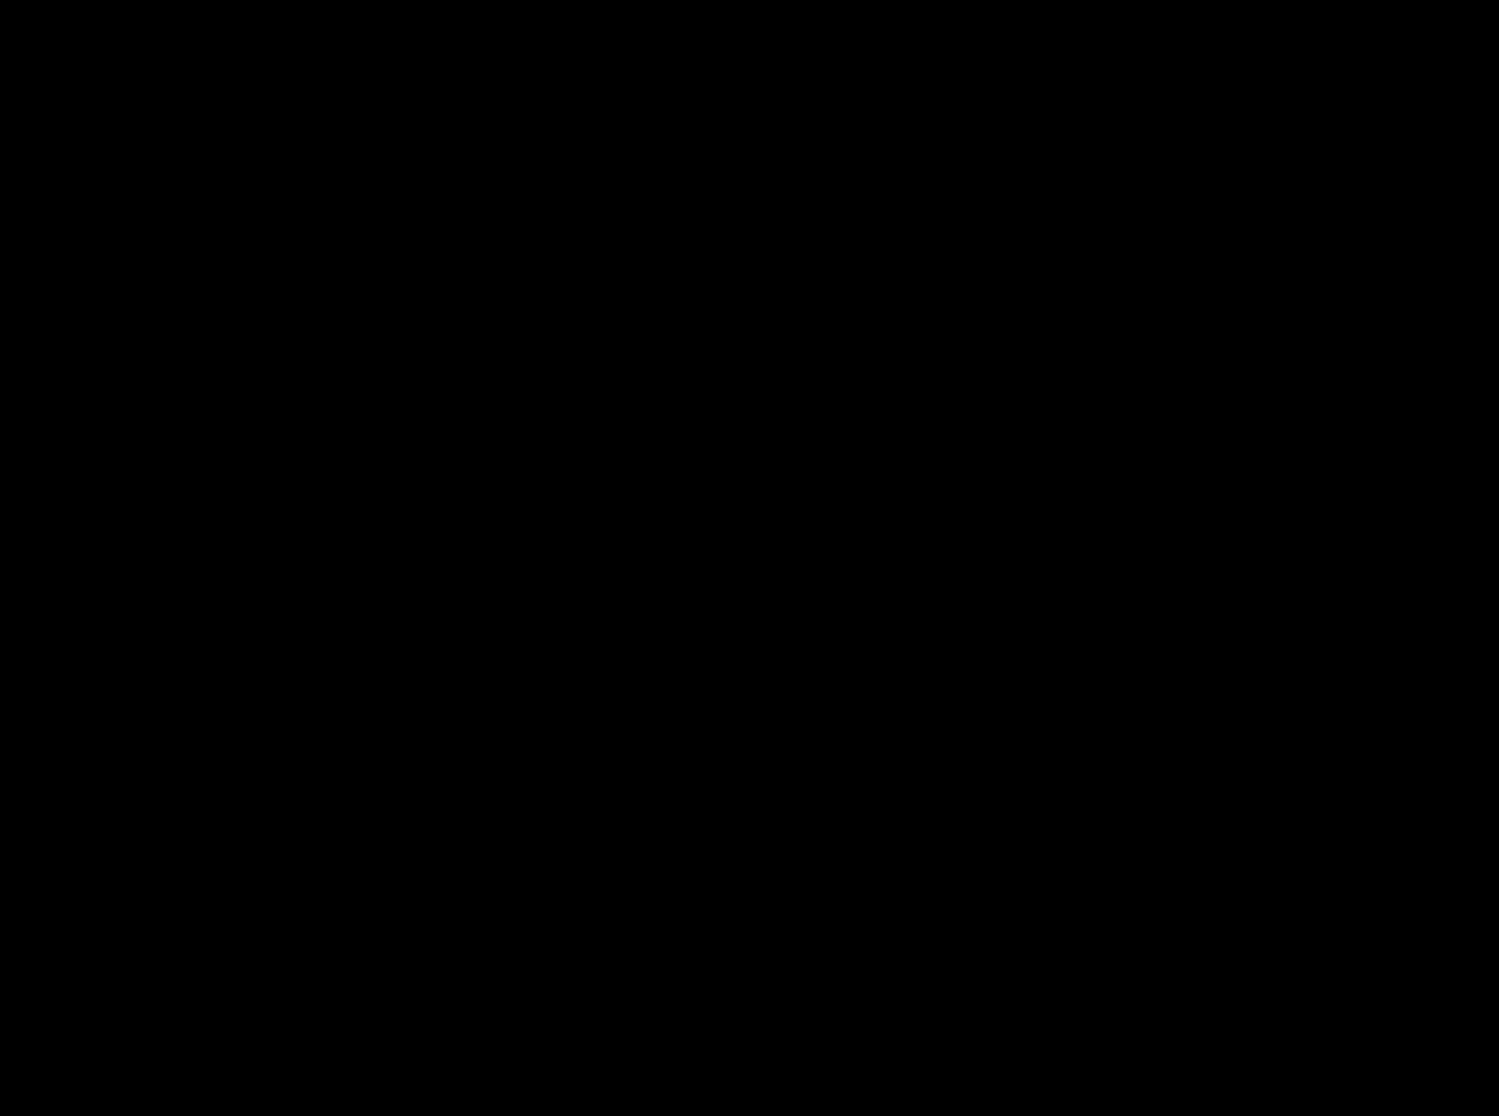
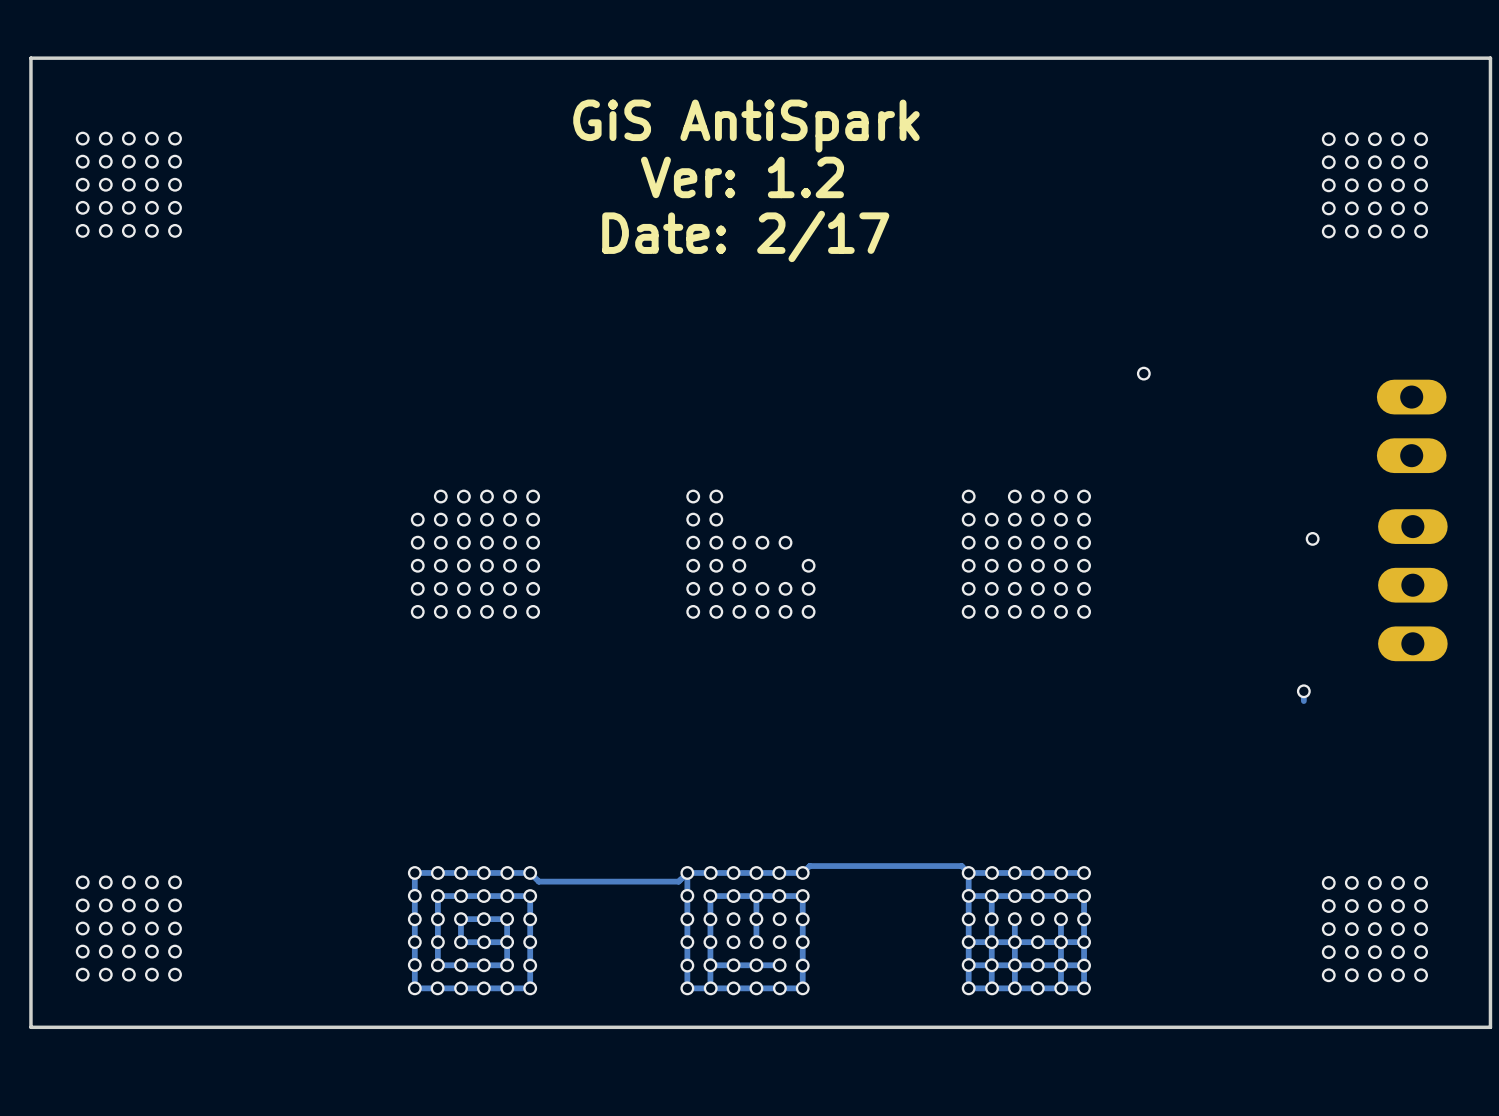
board edge: none -> (1490, 58) (30, 58) (30, 1027) (1490, 1027) (1490, 58)
text: none -> GiS AntiSpark (746, 126)
via: none -> (82, 138)
via: none -> (105, 138)
via: none -> (128, 138)
via: none -> (151, 138)
via: none -> (175, 138)
via: none -> (1328, 139)
via: none -> (1351, 139)
via: none -> (1374, 139)
via: none -> (1397, 139)
via: none -> (1421, 139)
via: none -> (82, 161)
via: none -> (105, 161)
via: none -> (128, 161)
via: none -> (151, 161)
via: none -> (175, 161)
via: none -> (1328, 162)
via: none -> (1351, 162)
via: none -> (1374, 162)
via: none -> (1397, 162)
via: none -> (1421, 162)
text: none -> Ver: 1.2 (742, 177)
via: none -> (82, 184)
via: none -> (105, 184)
via: none -> (128, 184)
via: none -> (151, 184)
via: none -> (175, 184)
via: none -> (1328, 185)
via: none -> (1351, 185)
via: none -> (1374, 185)
via: none -> (1397, 185)
via: none -> (1421, 185)
via: none -> (82, 207)
via: none -> (105, 207)
via: none -> (128, 207)
via: none -> (151, 207)
via: none -> (175, 207)
via: none -> (1328, 208)
via: none -> (1351, 208)
via: none -> (1374, 208)
via: none -> (1397, 208)
via: none -> (1421, 208)
via: none -> (82, 230)
via: none -> (105, 230)
via: none -> (128, 230)
via: none -> (151, 230)
via: none -> (175, 230)
via: none -> (1328, 231)
via: none -> (1351, 231)
via: none -> (1374, 231)
via: none -> (1397, 231)
via: none -> (1421, 231)
text: none -> Date: 2/17 (745, 236)
via: none -> (1143, 373)
part: none -> (1411, 426)
via: none -> (440, 496)
via: none -> (463, 496)
via: none -> (486, 496)
via: none -> (510, 496)
via: none -> (533, 496)
via: none -> (693, 496)
via: none -> (716, 496)
via: none -> (968, 496)
via: none -> (1014, 496)
via: none -> (1037, 496)
via: none -> (1060, 496)
via: none -> (1084, 496)
via: none -> (417, 519)
via: none -> (440, 519)
via: none -> (463, 519)
via: none -> (486, 519)
via: none -> (510, 519)
via: none -> (533, 519)
via: none -> (693, 519)
via: none -> (716, 519)
via: none -> (968, 519)
via: none -> (991, 519)
via: none -> (1014, 519)
via: none -> (1037, 519)
via: none -> (1060, 519)
via: none -> (1084, 519)
via: none -> (1312, 538)
via: none -> (417, 542)
via: none -> (440, 542)
via: none -> (463, 542)
via: none -> (486, 542)
via: none -> (510, 542)
via: none -> (533, 542)
via: none -> (693, 542)
via: none -> (716, 542)
via: none -> (739, 542)
via: none -> (762, 542)
via: none -> (785, 542)
via: none -> (968, 542)
via: none -> (991, 542)
via: none -> (1014, 542)
via: none -> (1037, 542)
via: none -> (1060, 542)
via: none -> (1084, 542)
via: none -> (417, 565)
via: none -> (440, 565)
via: none -> (463, 565)
via: none -> (486, 565)
via: none -> (510, 565)
via: none -> (533, 565)
via: none -> (693, 565)
via: none -> (716, 565)
via: none -> (739, 565)
via: none -> (808, 565)
via: none -> (968, 565)
via: none -> (991, 565)
via: none -> (1014, 565)
via: none -> (1037, 565)
via: none -> (1060, 565)
via: none -> (1084, 565)
part: none -> (1412, 585)
via: none -> (417, 588)
via: none -> (440, 588)
via: none -> (463, 588)
via: none -> (486, 588)
via: none -> (510, 588)
via: none -> (533, 588)
via: none -> (693, 588)
via: none -> (716, 588)
via: none -> (739, 588)
via: none -> (762, 588)
via: none -> (785, 588)
via: none -> (808, 588)
via: none -> (968, 588)
via: none -> (991, 588)
via: none -> (1014, 588)
via: none -> (1037, 588)
via: none -> (1060, 588)
via: none -> (1084, 588)
via: none -> (417, 611)
via: none -> (440, 611)
via: none -> (463, 611)
via: none -> (486, 611)
via: none -> (510, 611)
via: none -> (533, 611)
via: none -> (693, 611)
via: none -> (716, 611)
via: none -> (739, 611)
via: none -> (762, 611)
via: none -> (785, 611)
via: none -> (808, 611)
via: none -> (968, 611)
via: none -> (991, 611)
via: none -> (1014, 611)
via: none -> (1037, 611)
via: none -> (1060, 611)
via: none -> (1084, 611)
track: none -> (1303, 691) (1303, 701)
via: none -> (1303, 691)
via: none -> (414, 872)
via: none -> (437, 872)
via: none -> (461, 872)
via: none -> (483, 872)
via: none -> (507, 872)
via: none -> (530, 872)
track: none -> (687, 872) (687, 988) (802, 988) (802, 896) (710, 896) (710, 988)
track: none -> (687, 872) (678, 881) (538, 881) (530, 872) (414, 872) (414, 988) (530, 988) (530, 896) (437, 896) (437, 965) (507, 965) (507, 919) (460, 919) (460, 942) (507, 942)
via: none -> (687, 872)
via: none -> (710, 872)
via: none -> (733, 872)
via: none -> (756, 872)
via: none -> (779, 872)
via: none -> (802, 872)
track: none -> (968, 872) (968, 988) (1084, 988) (1084, 896) (968, 896)
track: none -> (968, 872) (961, 866) (809, 866) (802, 872) (687, 872)
via: none -> (968, 872)
via: none -> (992, 872)
via: none -> (1014, 872)
via: none -> (1037, 872)
via: none -> (1061, 872)
track: none -> (1084, 872) (968, 872)
via: none -> (1084, 872)
via: none -> (82, 882)
via: none -> (105, 882)
via: none -> (128, 882)
via: none -> (151, 882)
via: none -> (175, 882)
via: none -> (1328, 882)
via: none -> (1351, 882)
via: none -> (1374, 882)
via: none -> (1397, 882)
via: none -> (1421, 882)
via: none -> (414, 895)
via: none -> (687, 895)
via: none -> (968, 895)
via: none -> (437, 896)
via: none -> (461, 896)
via: none -> (483, 896)
via: none -> (507, 896)
via: none -> (530, 896)
via: none -> (710, 896)
via: none -> (733, 896)
track: none -> (756, 896) (756, 942)
via: none -> (756, 896)
via: none -> (779, 896)
via: none -> (802, 896)
track: none -> (991, 896) (991, 988)
via: none -> (991, 896)
via: none -> (1014, 896)
via: none -> (1037, 896)
via: none -> (1061, 896)
via: none -> (1084, 896)
via: none -> (82, 905)
via: none -> (105, 905)
via: none -> (128, 905)
via: none -> (151, 905)
via: none -> (175, 905)
via: none -> (1328, 906)
via: none -> (1351, 906)
via: none -> (1374, 906)
via: none -> (1397, 906)
via: none -> (1421, 906)
via: none -> (414, 919)
via: none -> (437, 919)
via: none -> (460, 919)
via: none -> (483, 919)
via: none -> (507, 919)
via: none -> (530, 919)
via: none -> (687, 919)
via: none -> (710, 919)
via: none -> (733, 919)
via: none -> (756, 919)
via: none -> (779, 919)
via: none -> (802, 919)
via: none -> (968, 919)
via: none -> (991, 919)
track: none -> (1014, 919) (1014, 988)
via: none -> (1014, 919)
via: none -> (1037, 919)
track: none -> (1060, 919) (1060, 988)
via: none -> (1060, 919)
via: none -> (1084, 919)
via: none -> (82, 928)
via: none -> (105, 928)
via: none -> (128, 928)
via: none -> (151, 928)
via: none -> (175, 928)
via: none -> (1328, 929)
via: none -> (1351, 929)
via: none -> (1374, 929)
via: none -> (1397, 929)
via: none -> (1421, 929)
via: none -> (414, 942)
via: none -> (437, 942)
via: none -> (460, 942)
via: none -> (484, 942)
via: none -> (507, 942)
via: none -> (530, 942)
via: none -> (687, 942)
via: none -> (710, 942)
via: none -> (733, 942)
via: none -> (756, 942)
via: none -> (779, 942)
via: none -> (802, 942)
via: none -> (968, 942)
via: none -> (991, 942)
via: none -> (1014, 942)
via: none -> (1037, 942)
via: none -> (1060, 942)
track: none -> (1084, 942) (968, 942)
via: none -> (1084, 942)
via: none -> (82, 951)
via: none -> (105, 951)
via: none -> (128, 951)
via: none -> (151, 951)
via: none -> (175, 951)
via: none -> (1328, 952)
via: none -> (1351, 952)
via: none -> (1374, 952)
via: none -> (1397, 952)
via: none -> (1421, 952)
via: none -> (414, 965)
via: none -> (437, 965)
via: none -> (461, 965)
via: none -> (483, 965)
via: none -> (507, 965)
via: none -> (530, 965)
via: none -> (687, 965)
via: none -> (710, 965)
via: none -> (733, 965)
via: none -> (756, 965)
track: none -> (779, 965) (710, 965)
via: none -> (779, 965)
via: none -> (802, 965)
via: none -> (968, 965)
via: none -> (991, 965)
via: none -> (1014, 965)
via: none -> (1037, 965)
via: none -> (1060, 965)
track: none -> (1083, 965) (968, 965)
via: none -> (1084, 965)
via: none -> (82, 974)
via: none -> (105, 974)
via: none -> (128, 974)
via: none -> (151, 974)
via: none -> (175, 974)
via: none -> (1328, 975)
via: none -> (1351, 975)
via: none -> (1374, 975)
via: none -> (1397, 975)
via: none -> (1421, 975)
via: none -> (414, 988)
via: none -> (437, 988)
via: none -> (461, 988)
via: none -> (483, 988)
via: none -> (507, 988)
via: none -> (530, 988)
via: none -> (687, 988)
via: none -> (710, 988)
via: none -> (733, 988)
via: none -> (756, 988)
via: none -> (779, 988)
via: none -> (802, 988)
via: none -> (968, 988)
via: none -> (992, 988)
via: none -> (1014, 988)
via: none -> (1037, 988)
via: none -> (1061, 988)
via: none -> (1084, 988)

